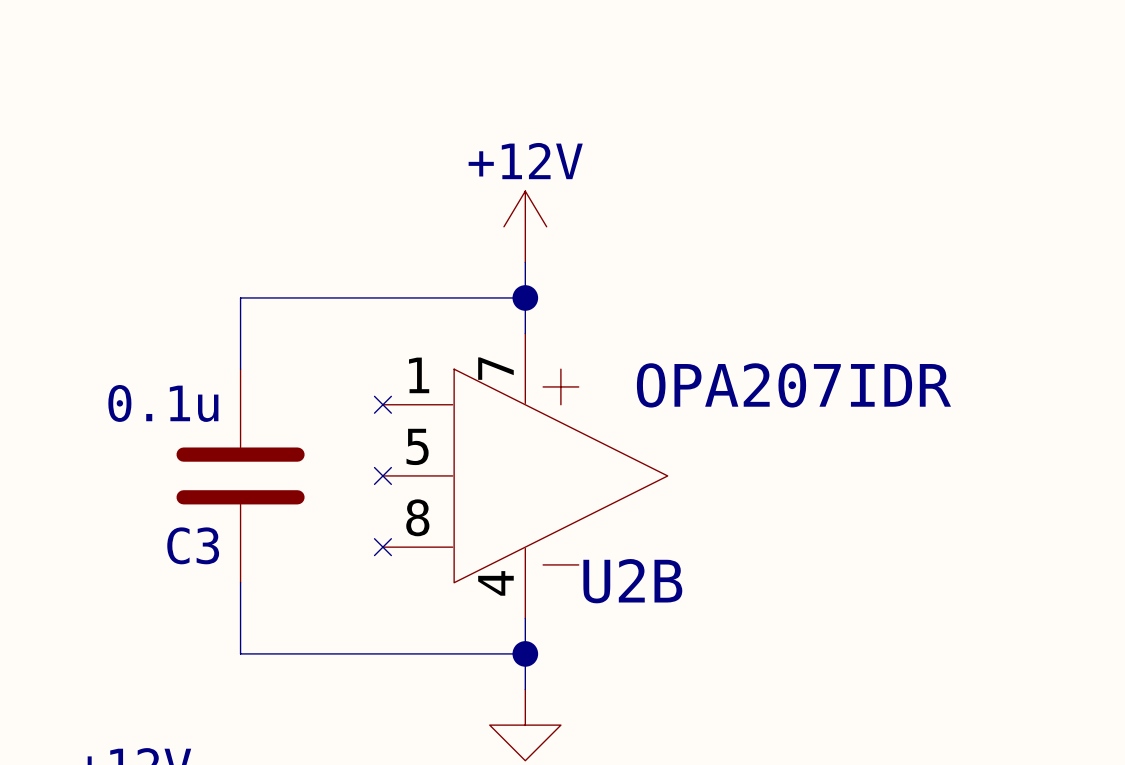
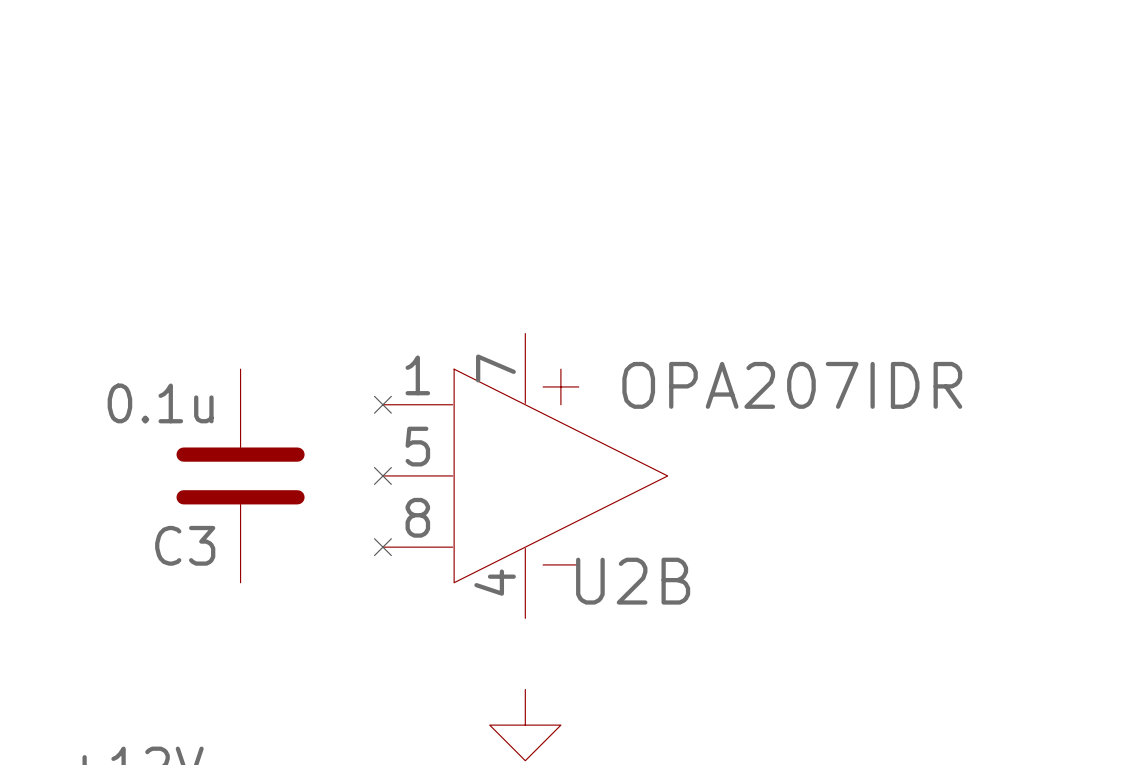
power symbol: +12V (525, 226) -> none
wire: (525, 262) (525, 333) -> none
wire: (525, 297) (240, 297) (240, 369) -> none
junction: (525, 297) -> none
wire: (240, 582) (240, 653) (525, 653) -> none
wire: (525, 618) (525, 689) -> none
junction: (525, 653) -> none

